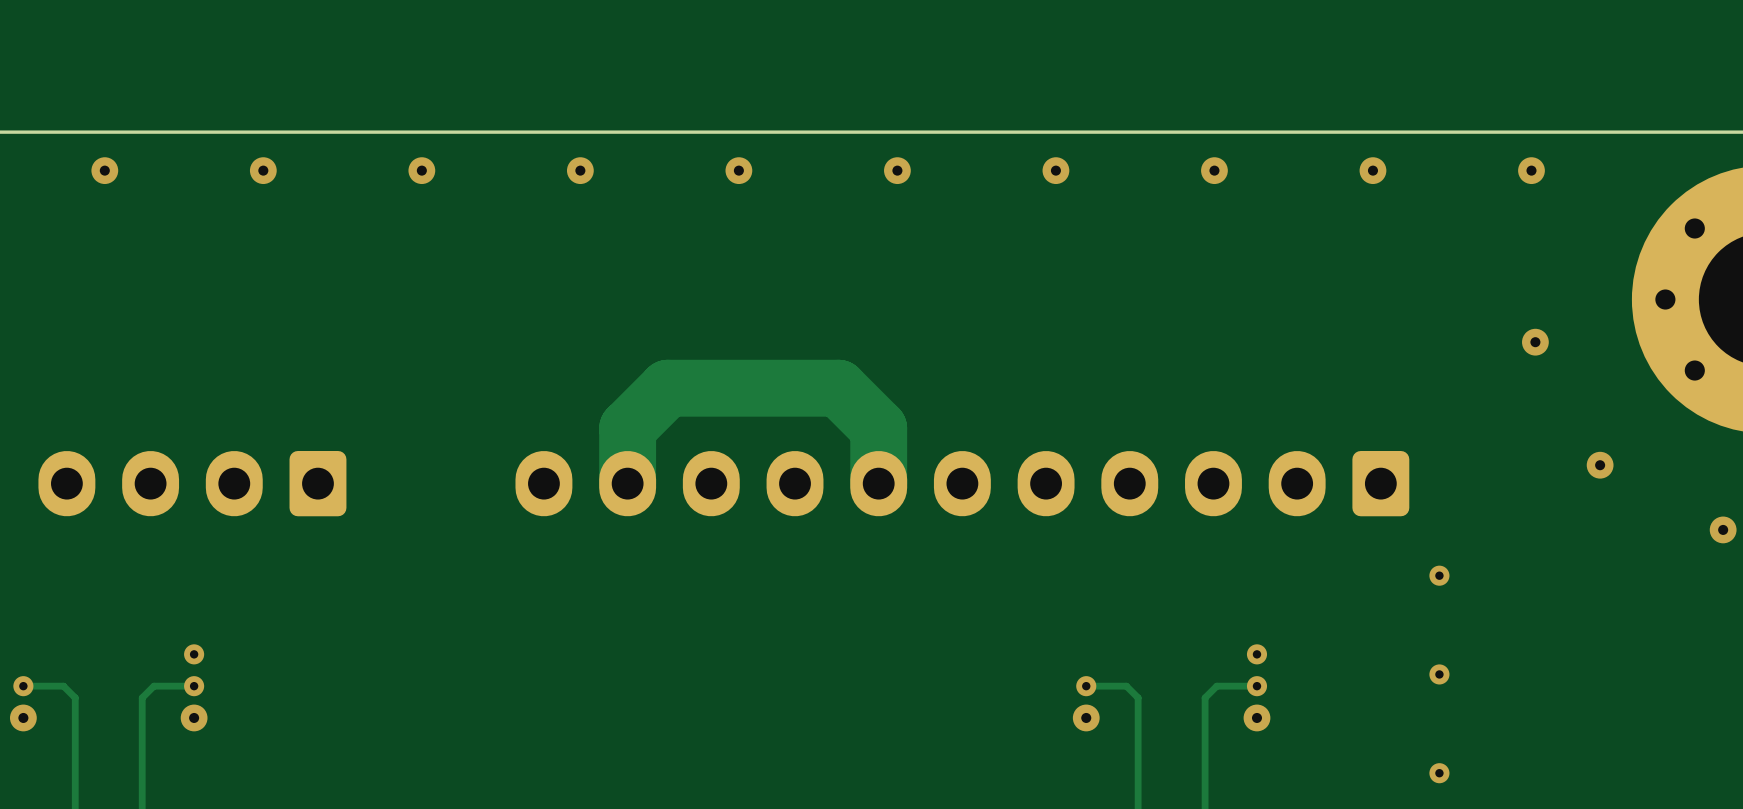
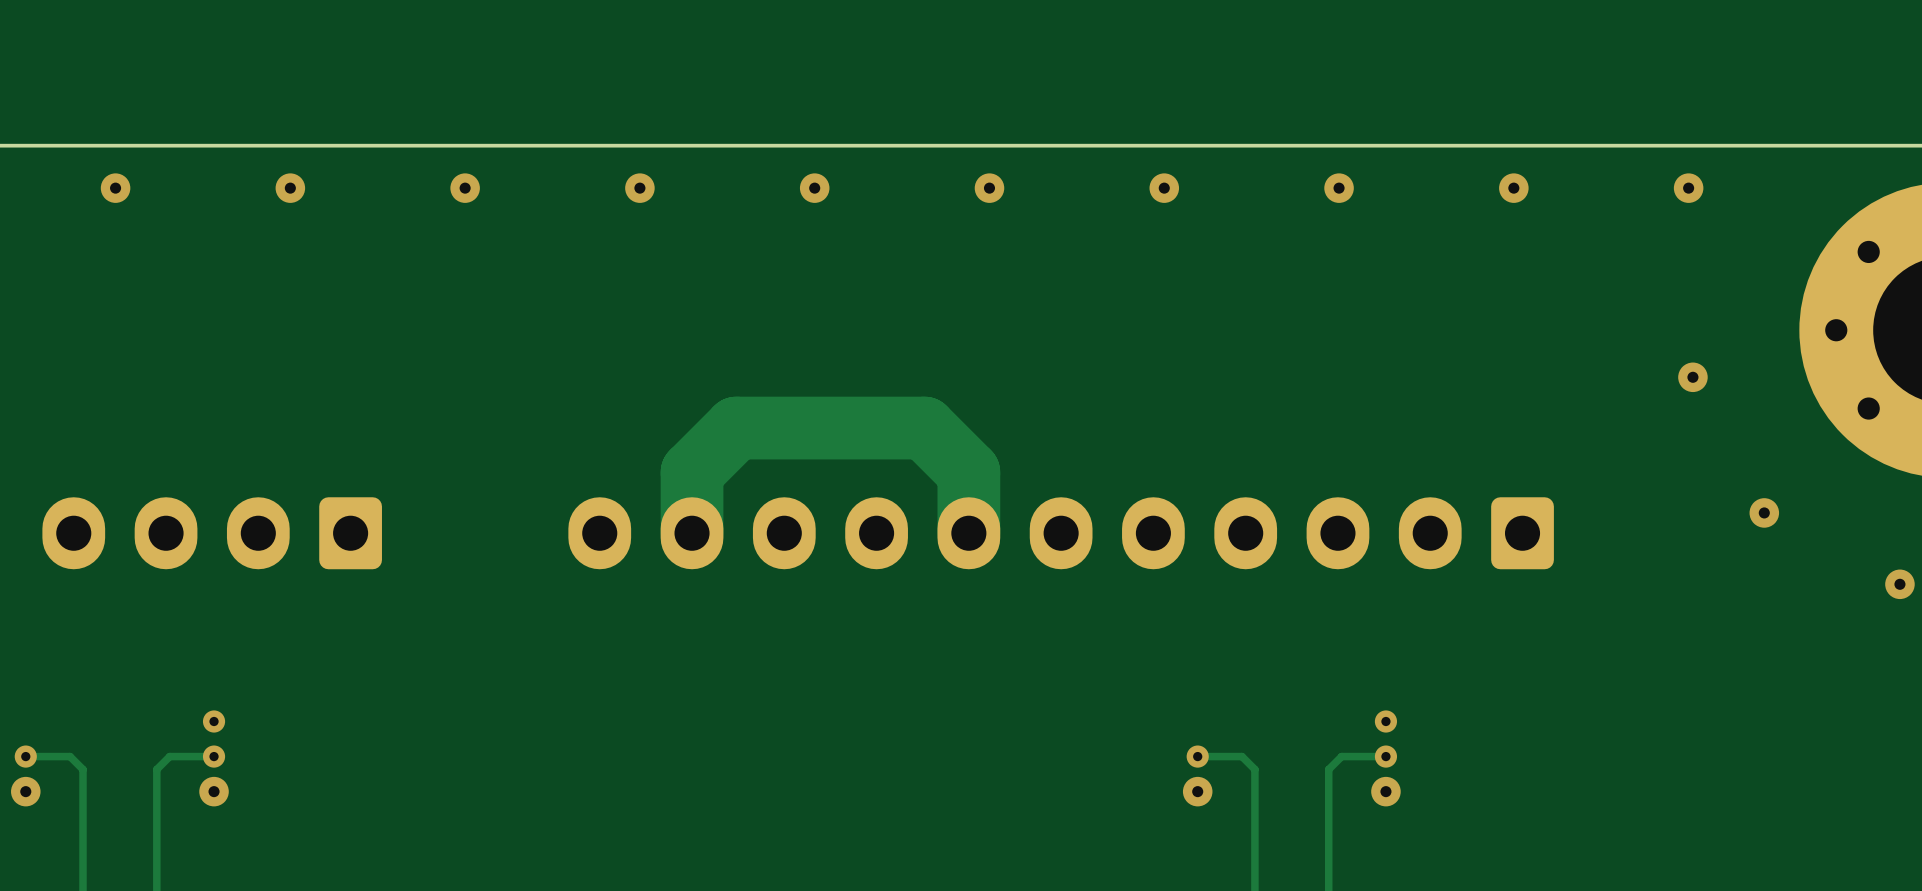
via: (1439, 575) -> none
via: (1439, 674) -> none
via: (1439, 773) -> none

